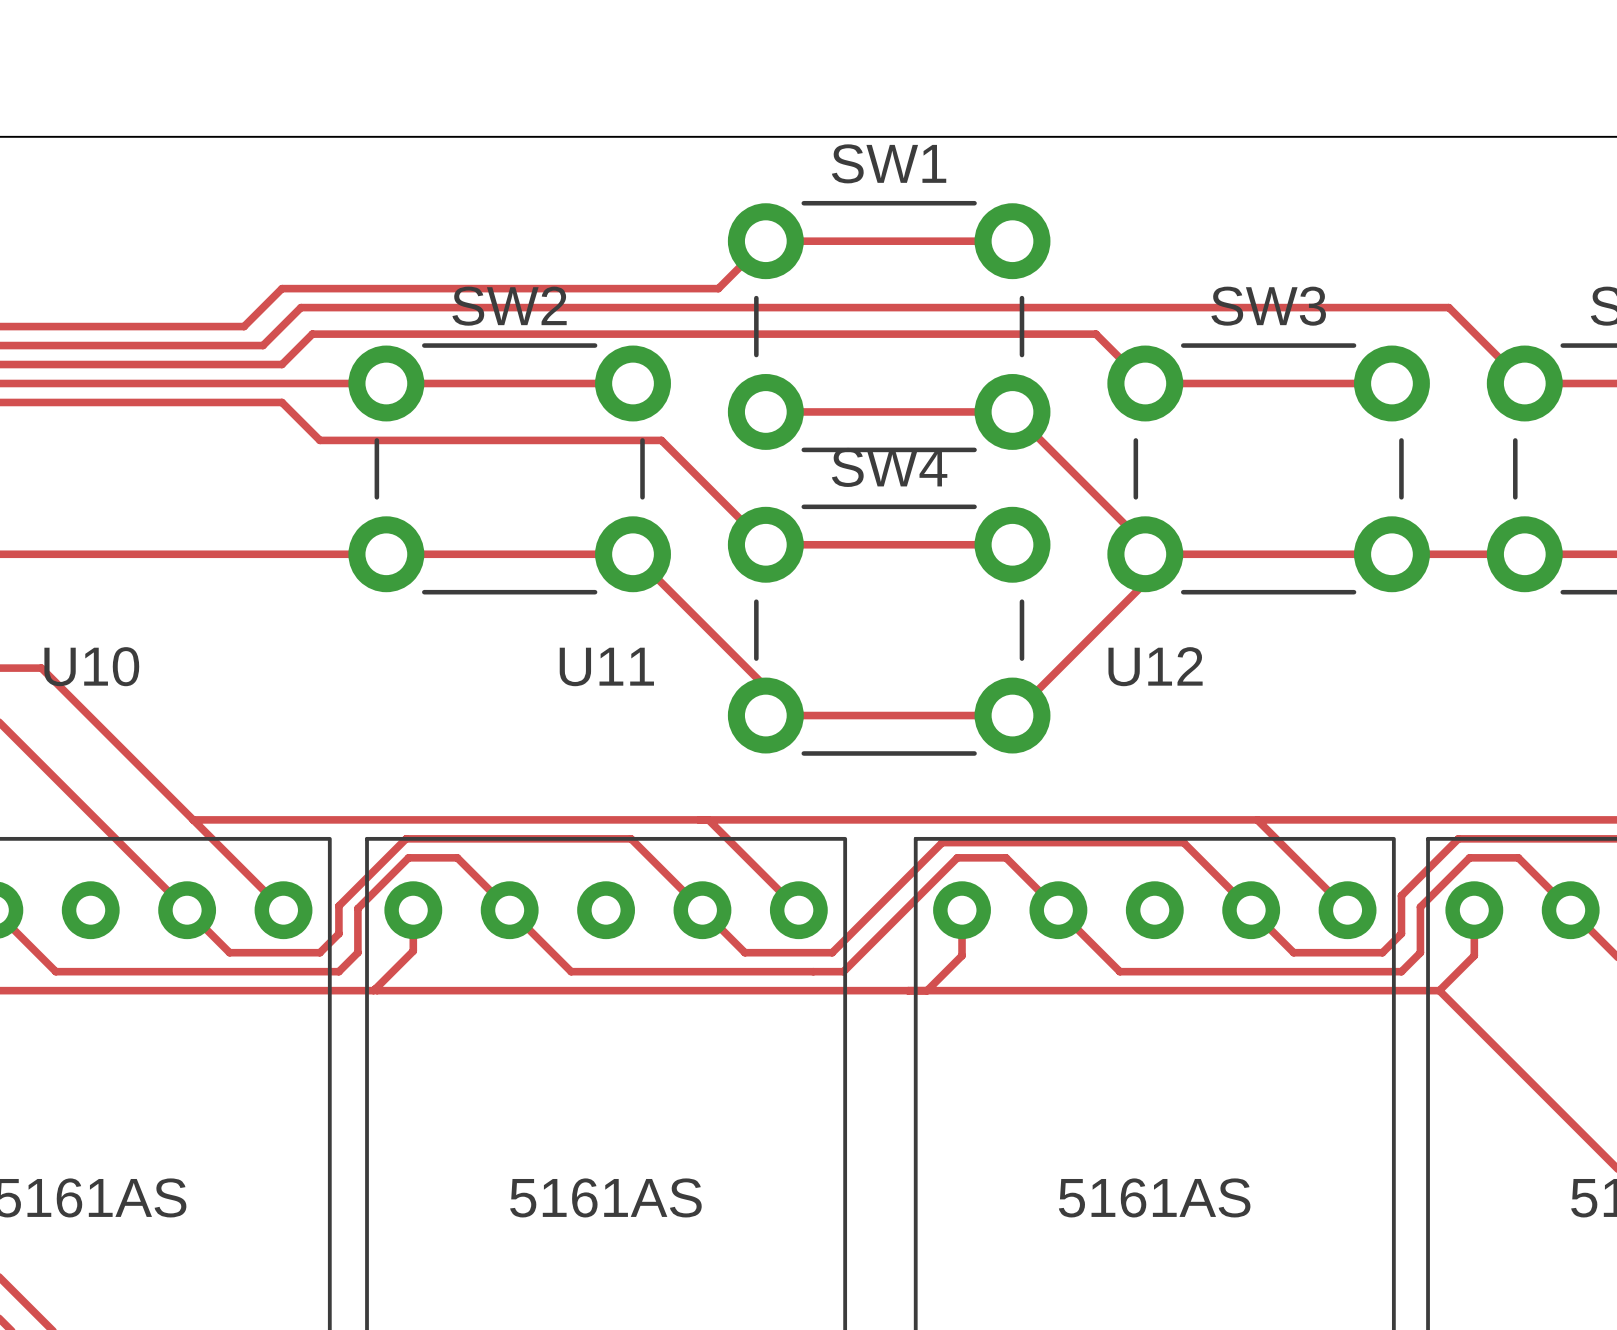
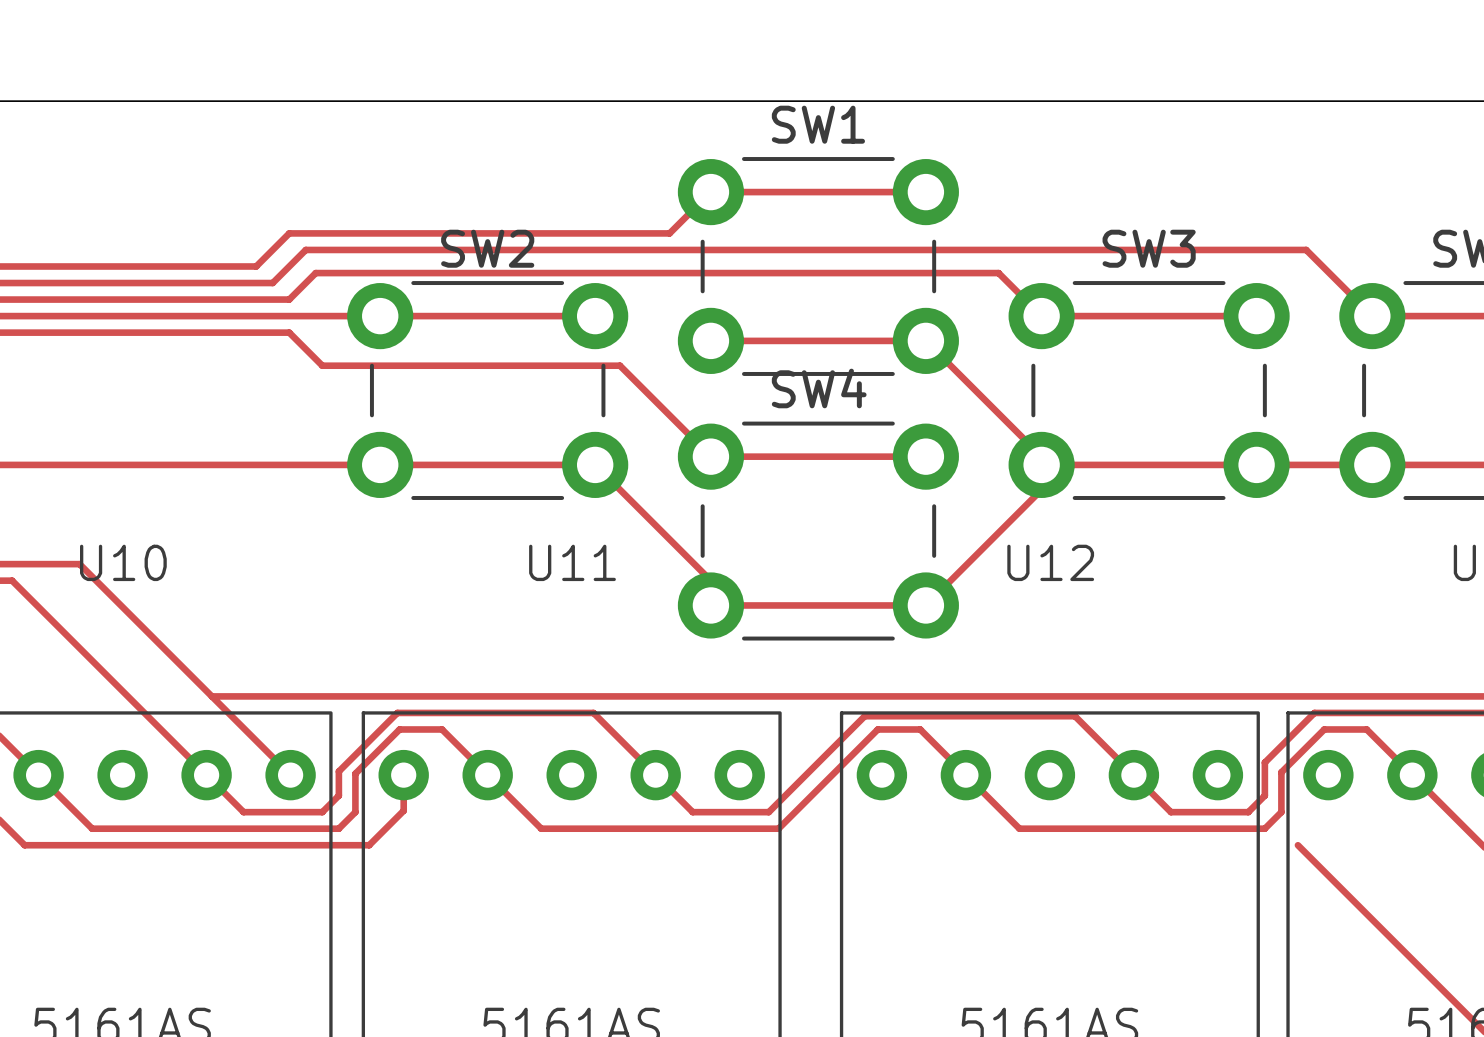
track: (708, 819) (798, 910) -> none
track: (1257, 819) (1347, 910) -> none
track: (962, 910) (962, 955) (927, 990) -> none
track: (1474, 910) (1474, 955) (1439, 990) (376, 990) (375, 989) -> none

